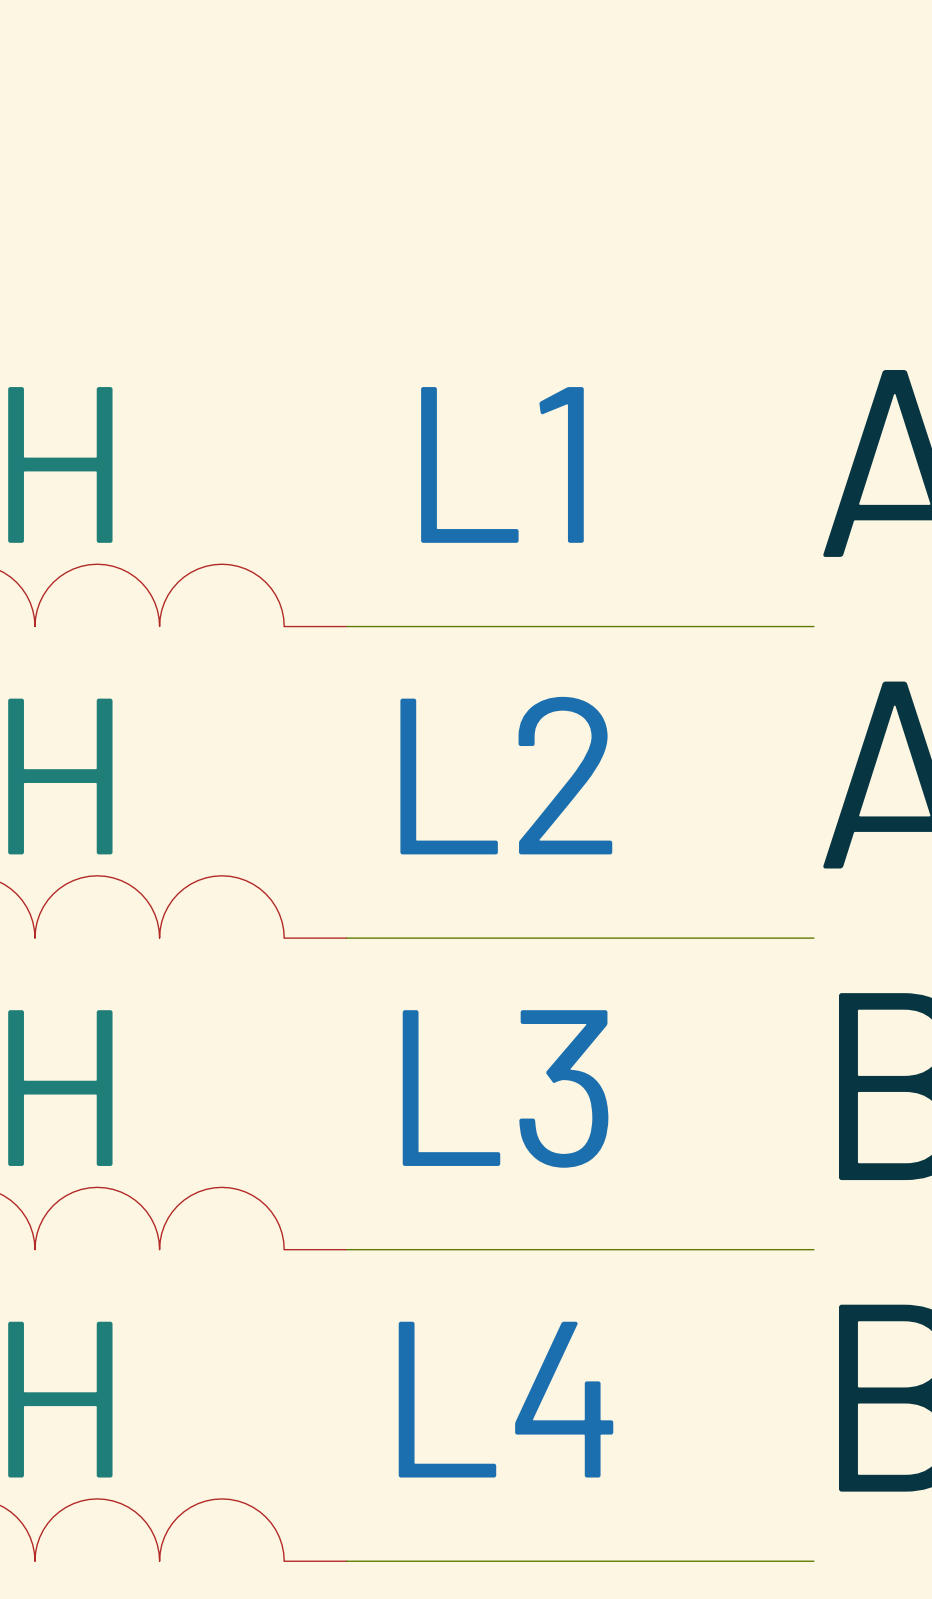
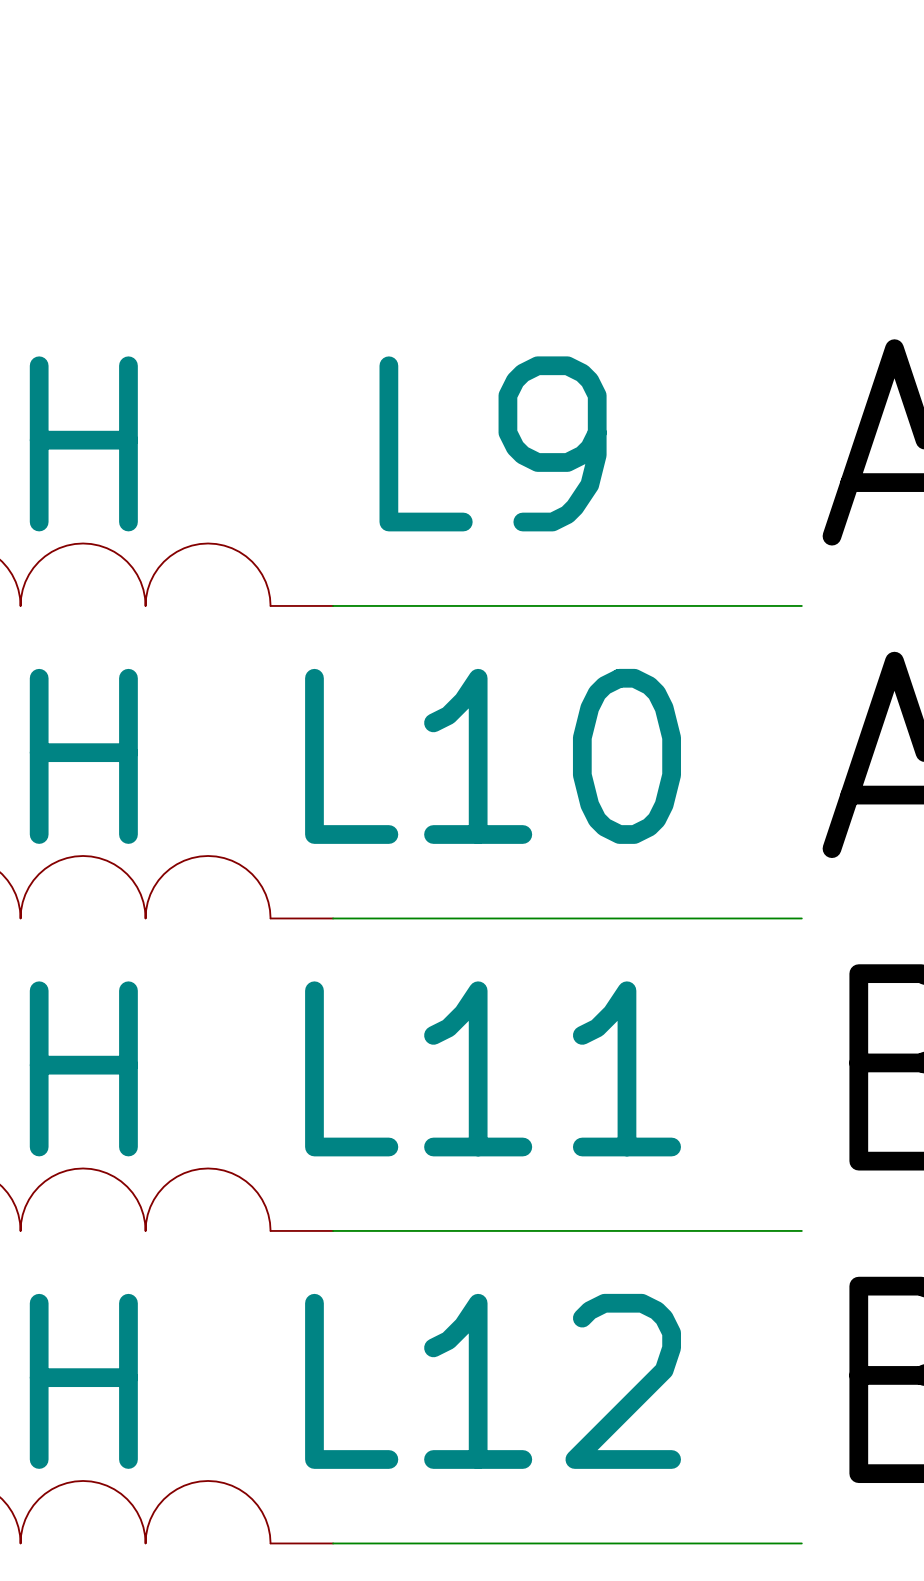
L1 name: L1 (502, 464) -> L9 (493, 443)
L2 name: L2 (506, 775) -> L10 (493, 756)
L3 name: L3 (505, 1088) -> L11 (493, 1068)
L4 name: L4 (506, 1399) -> L12 (493, 1381)

